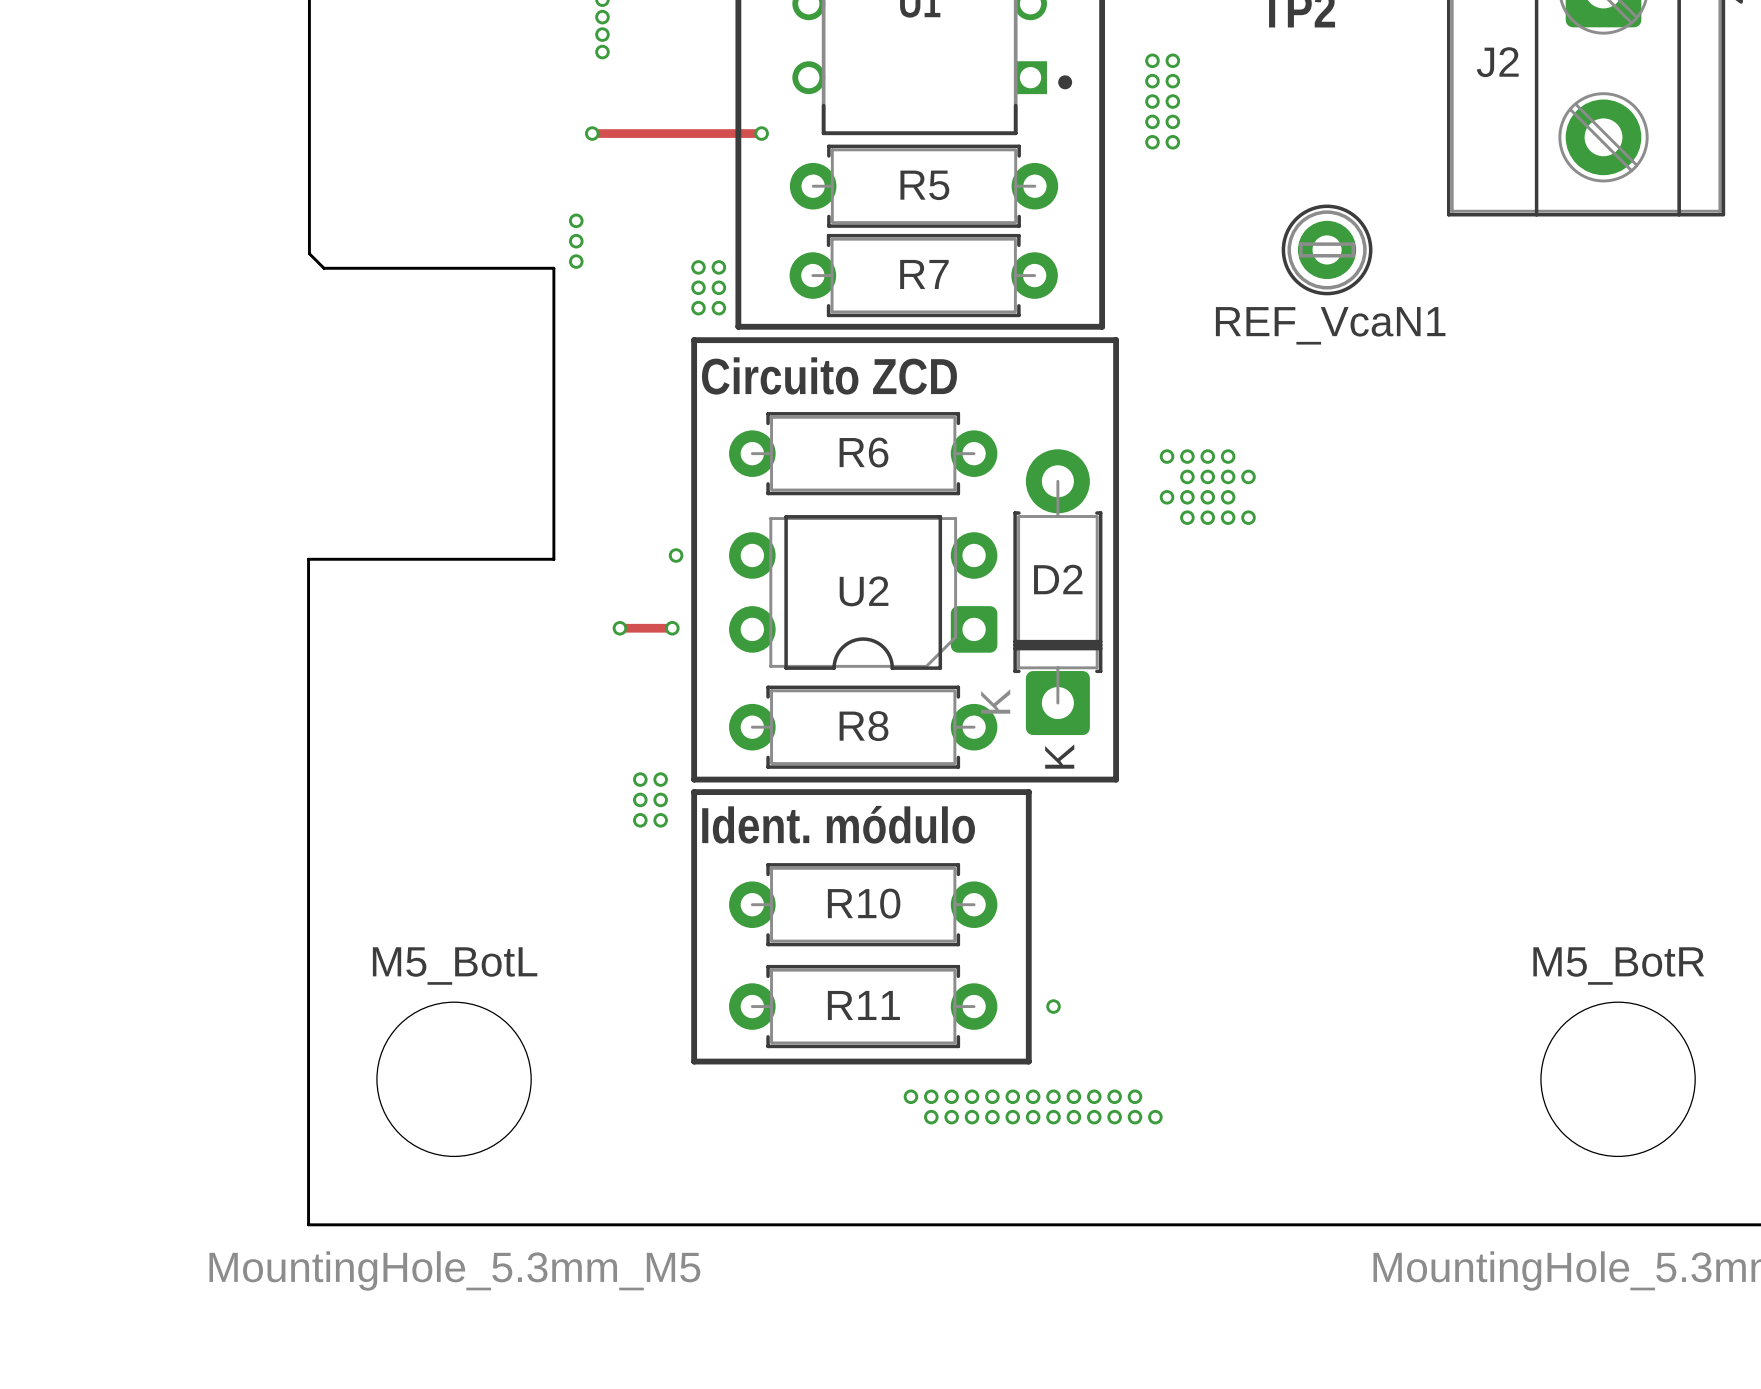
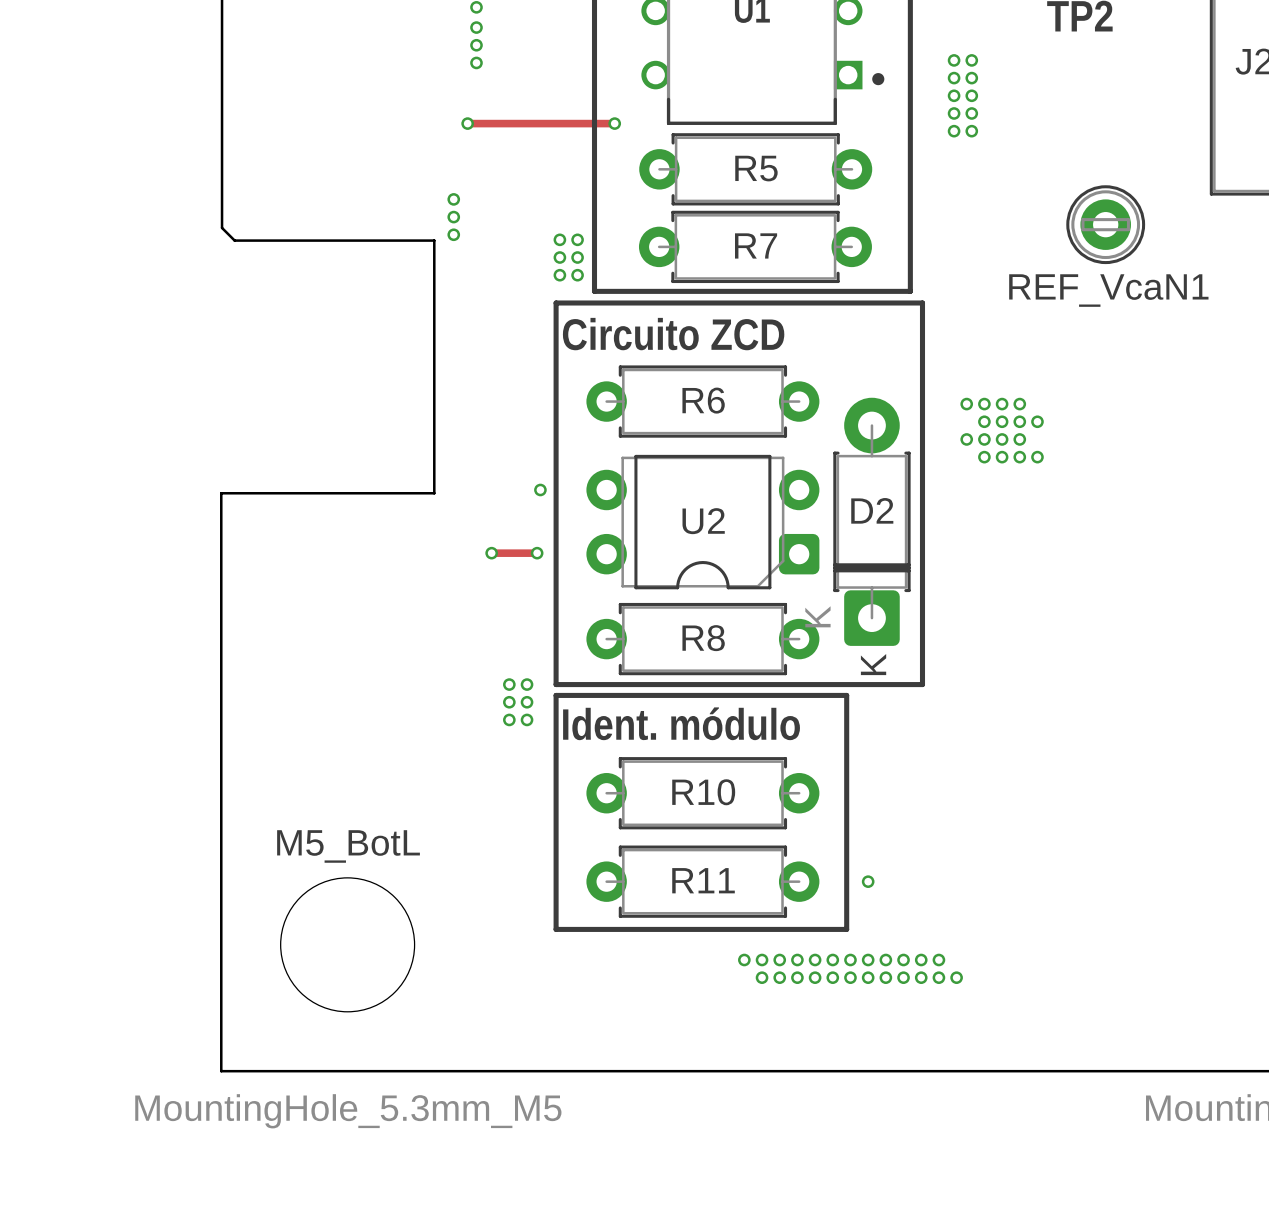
via: (602, 17) -> none
via: none -> (476, 27)
via: (602, 34) -> none
via: none -> (476, 45)
via: (602, 52) -> none
via: none -> (476, 62)

